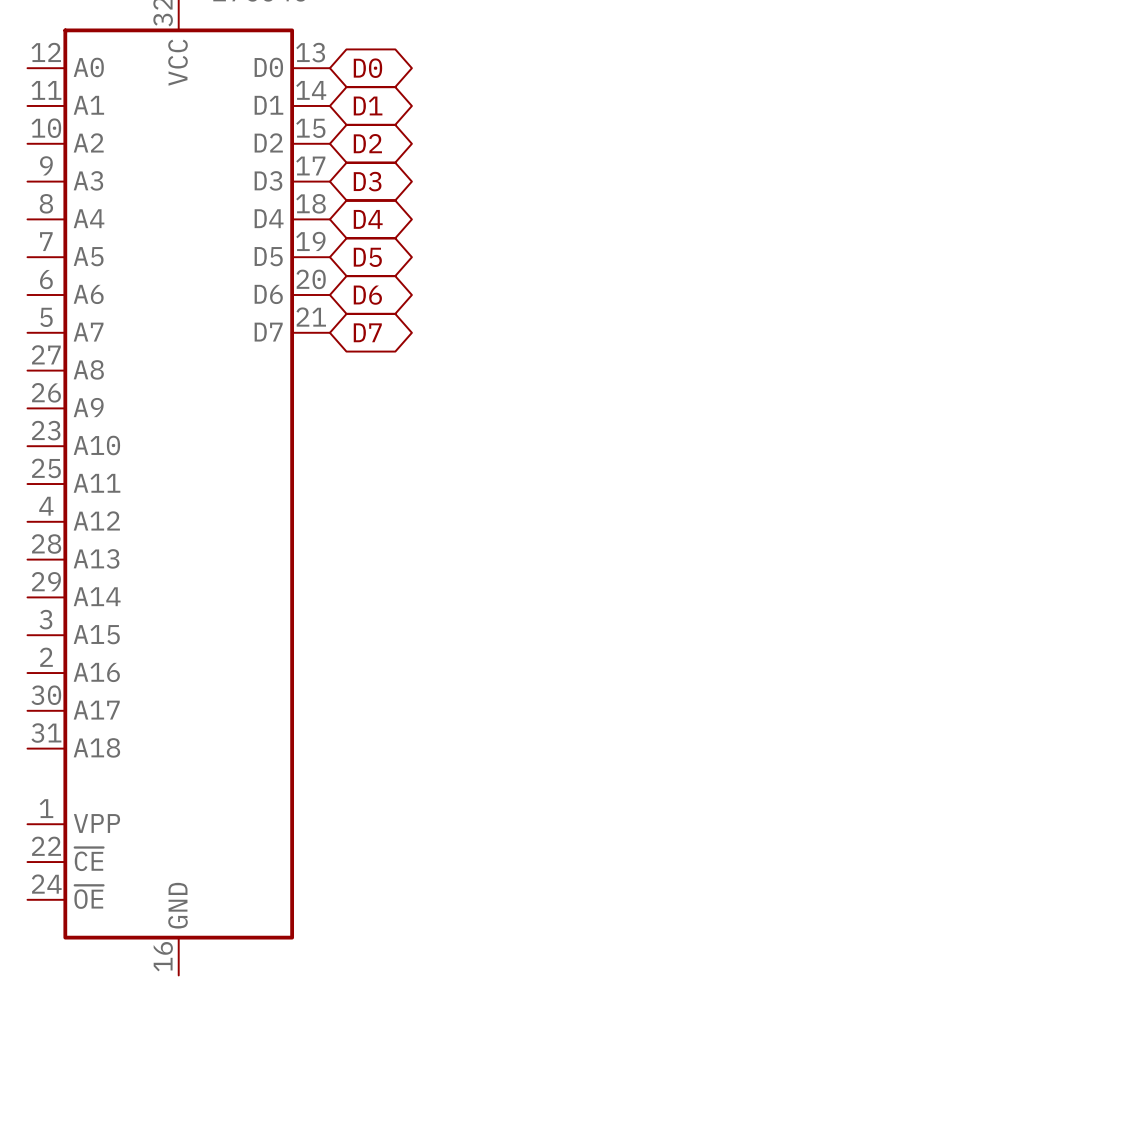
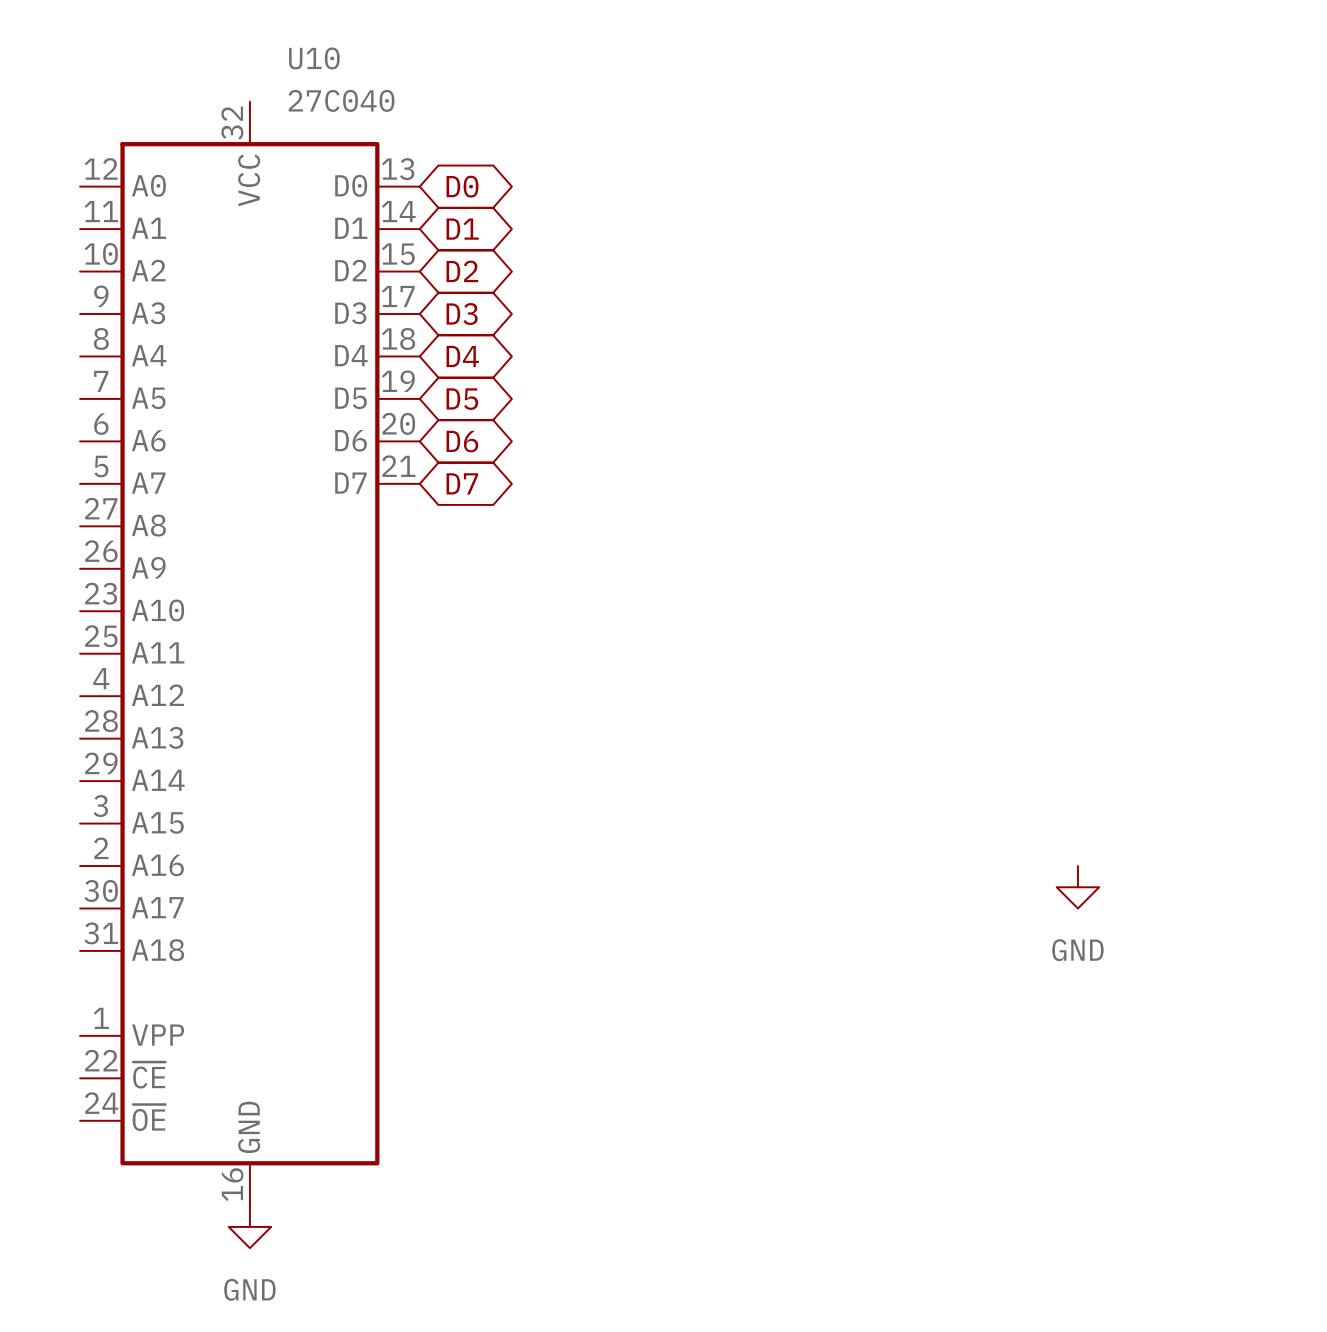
power symbol: none -> GND (1077, 887)
power symbol: none -> GND (249, 1226)

